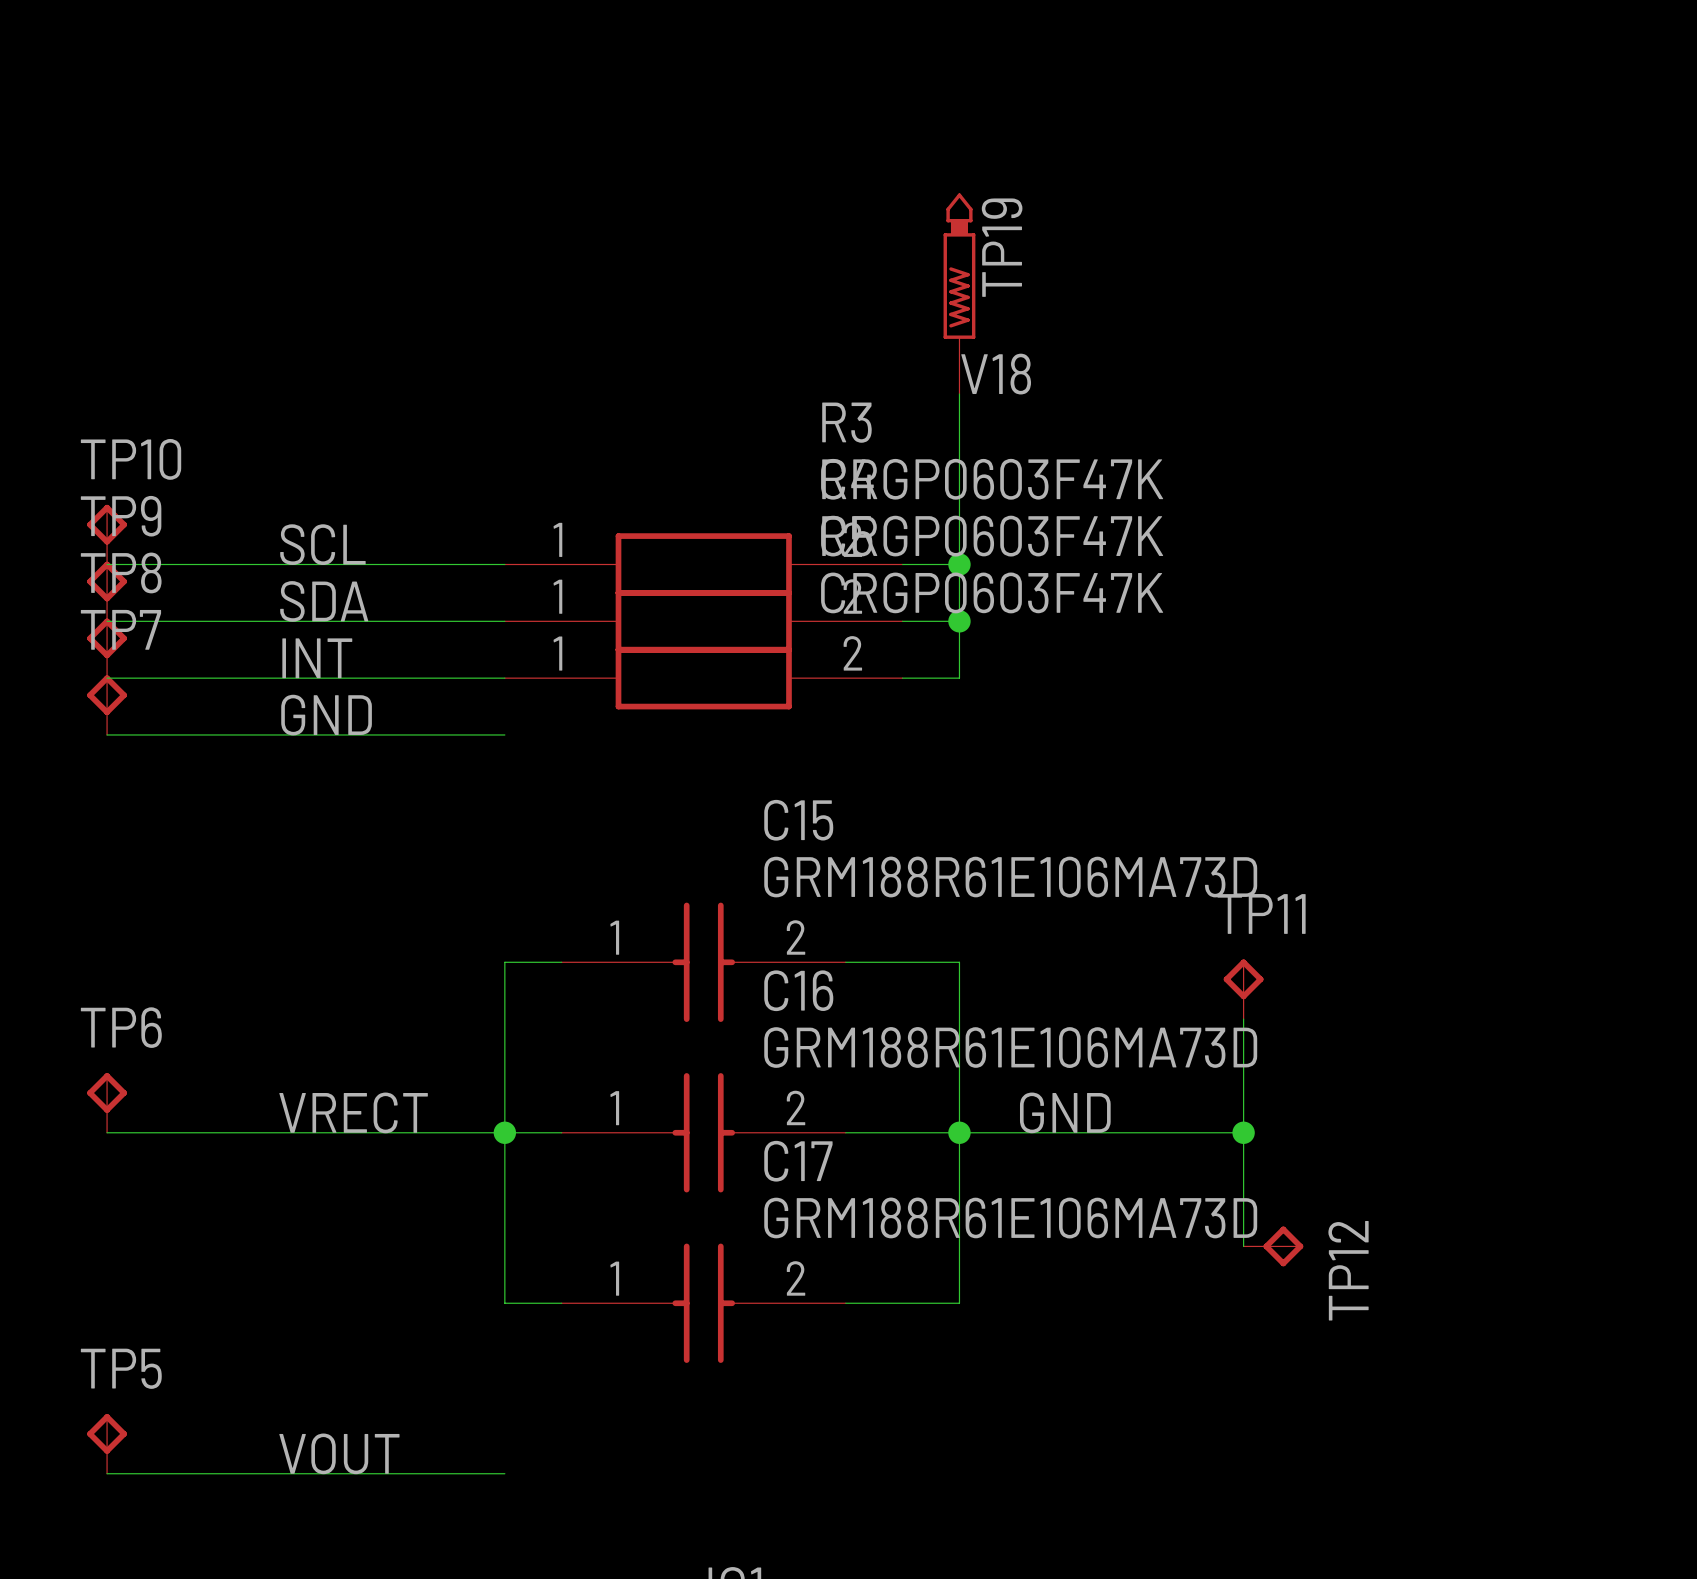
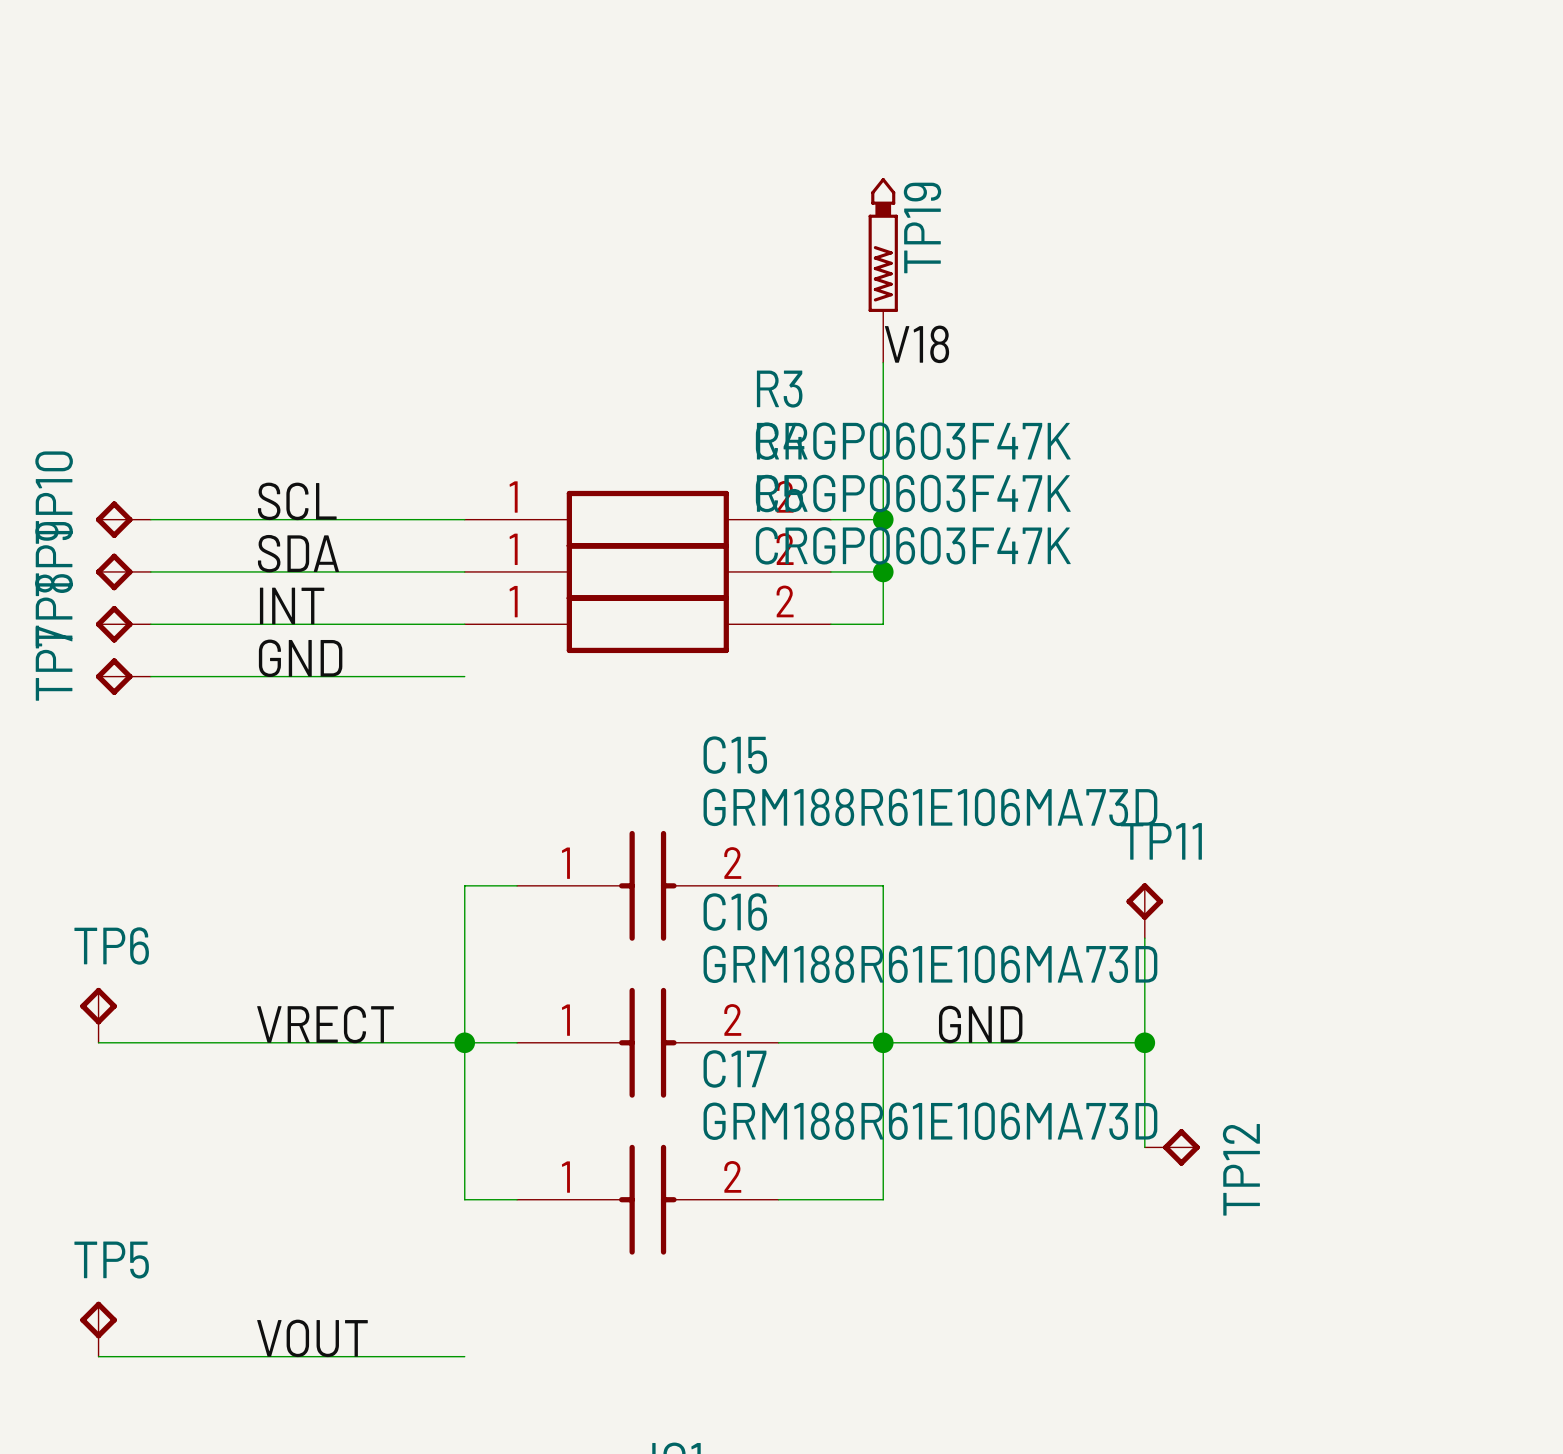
TP10 rotation: 0° (107, 524) -> 90° counterclockwise (114, 519)
TP10 position: (107, 534) -> (123, 519)
TP9 rotation: 0° (107, 581) -> 90° counterclockwise (114, 571)
TP9 position: (107, 591) -> (123, 571)
TP8 rotation: 0° (107, 638) -> 90° counterclockwise (114, 624)
TP8 position: (107, 648) -> (123, 624)
TP7 rotation: 0° (107, 695) -> 90° counterclockwise (114, 676)
TP7 position: (107, 705) -> (123, 676)

